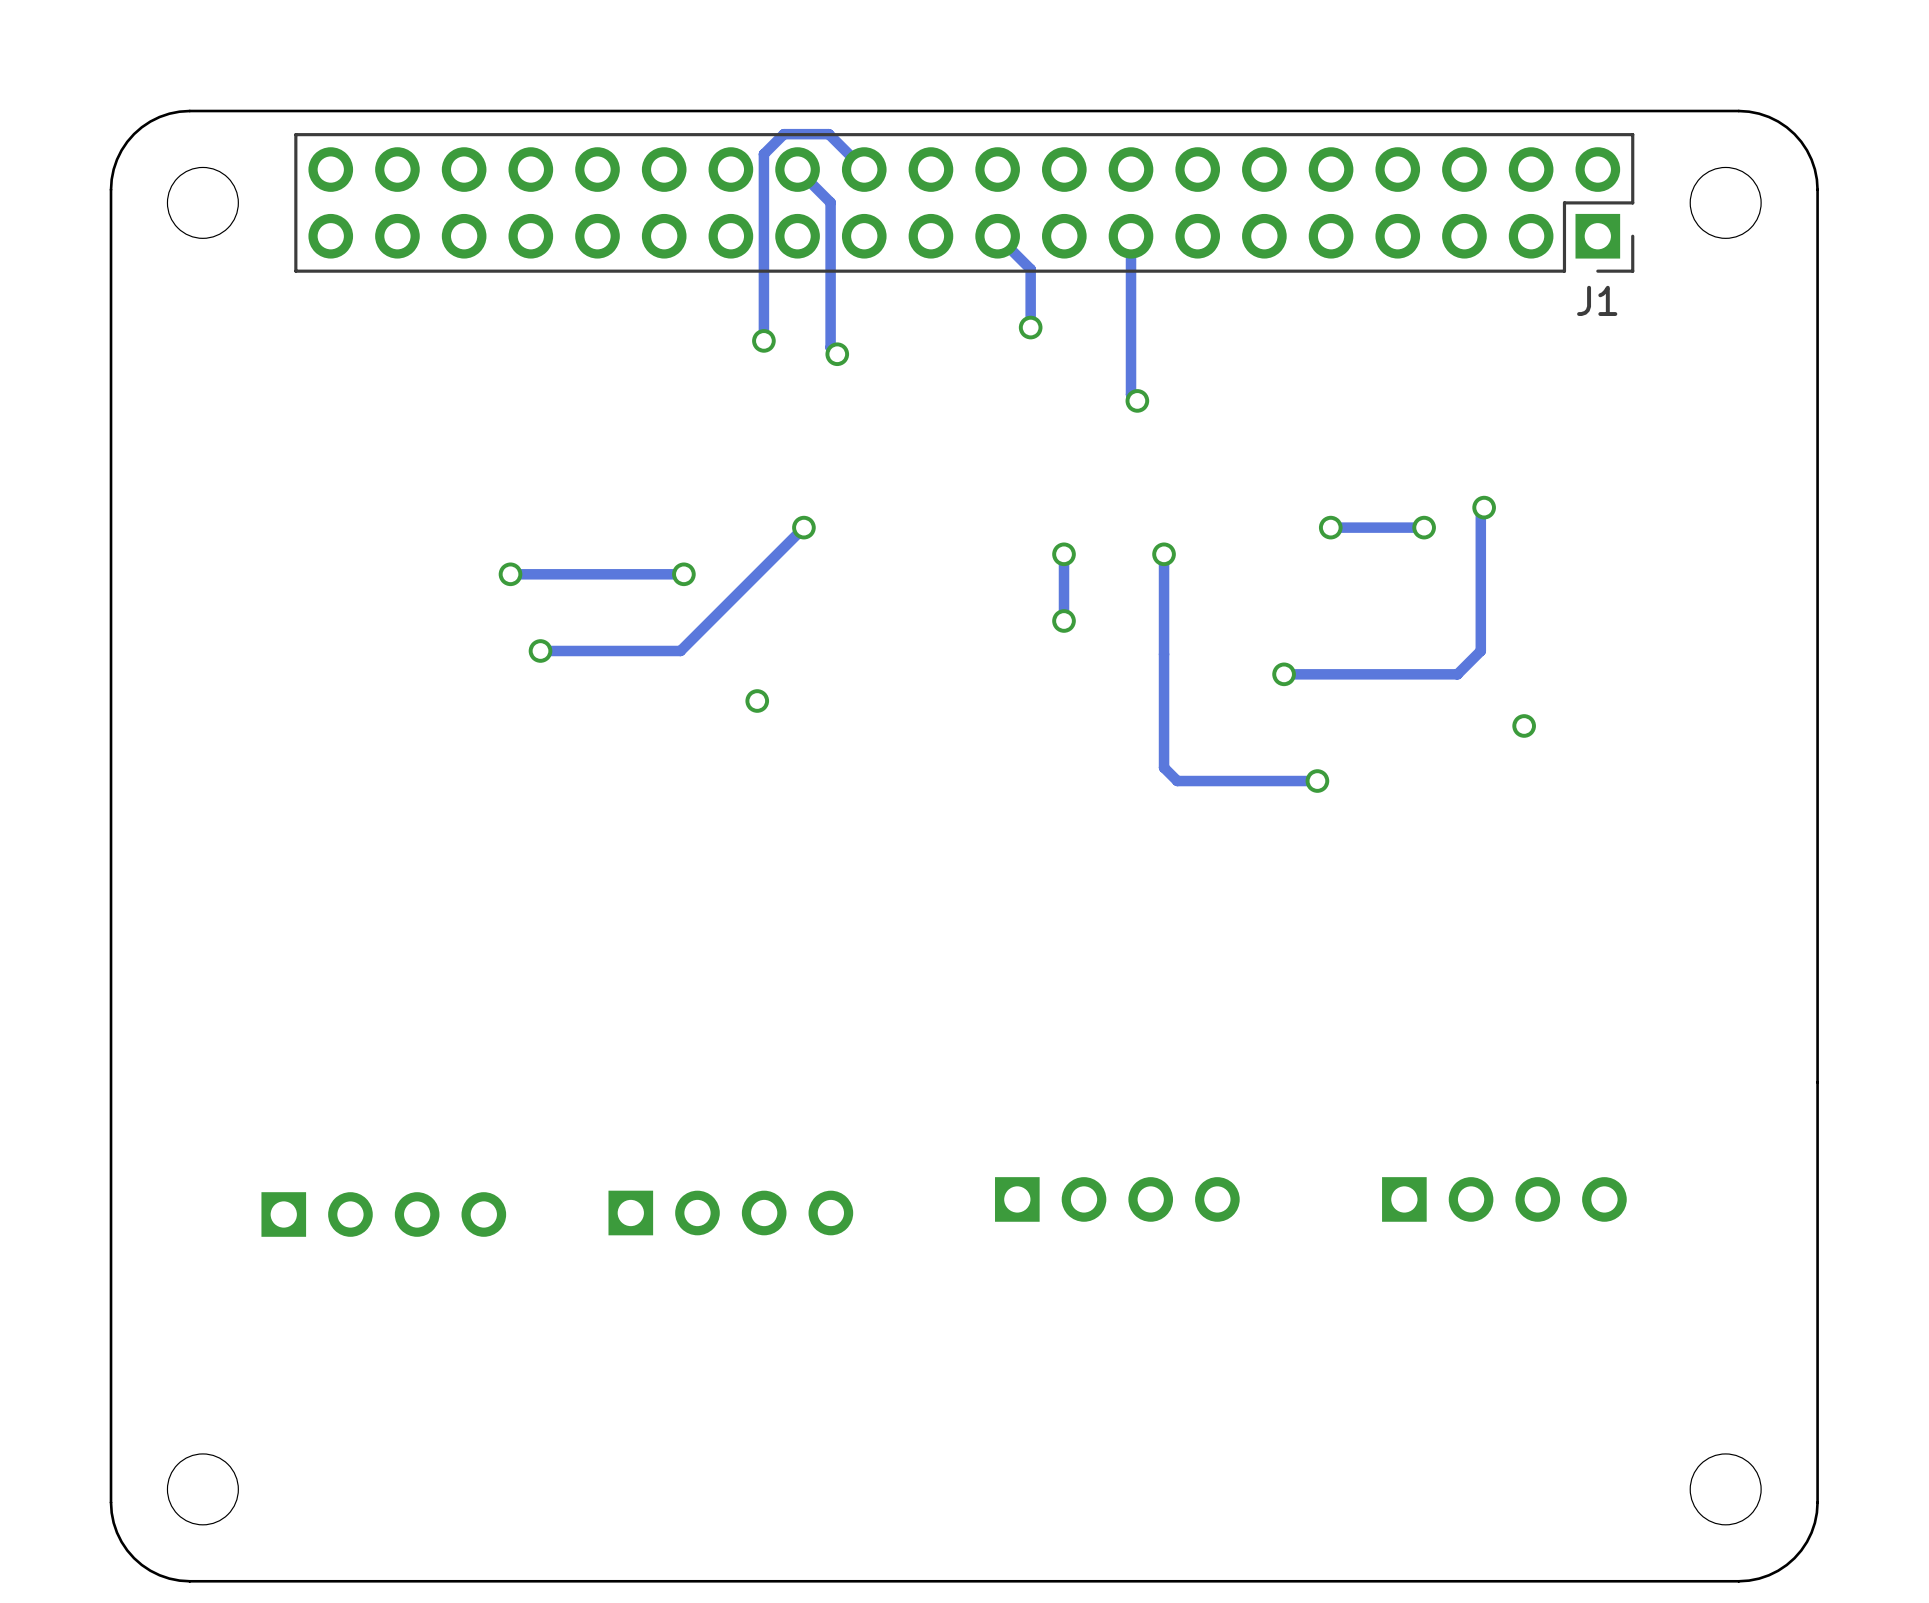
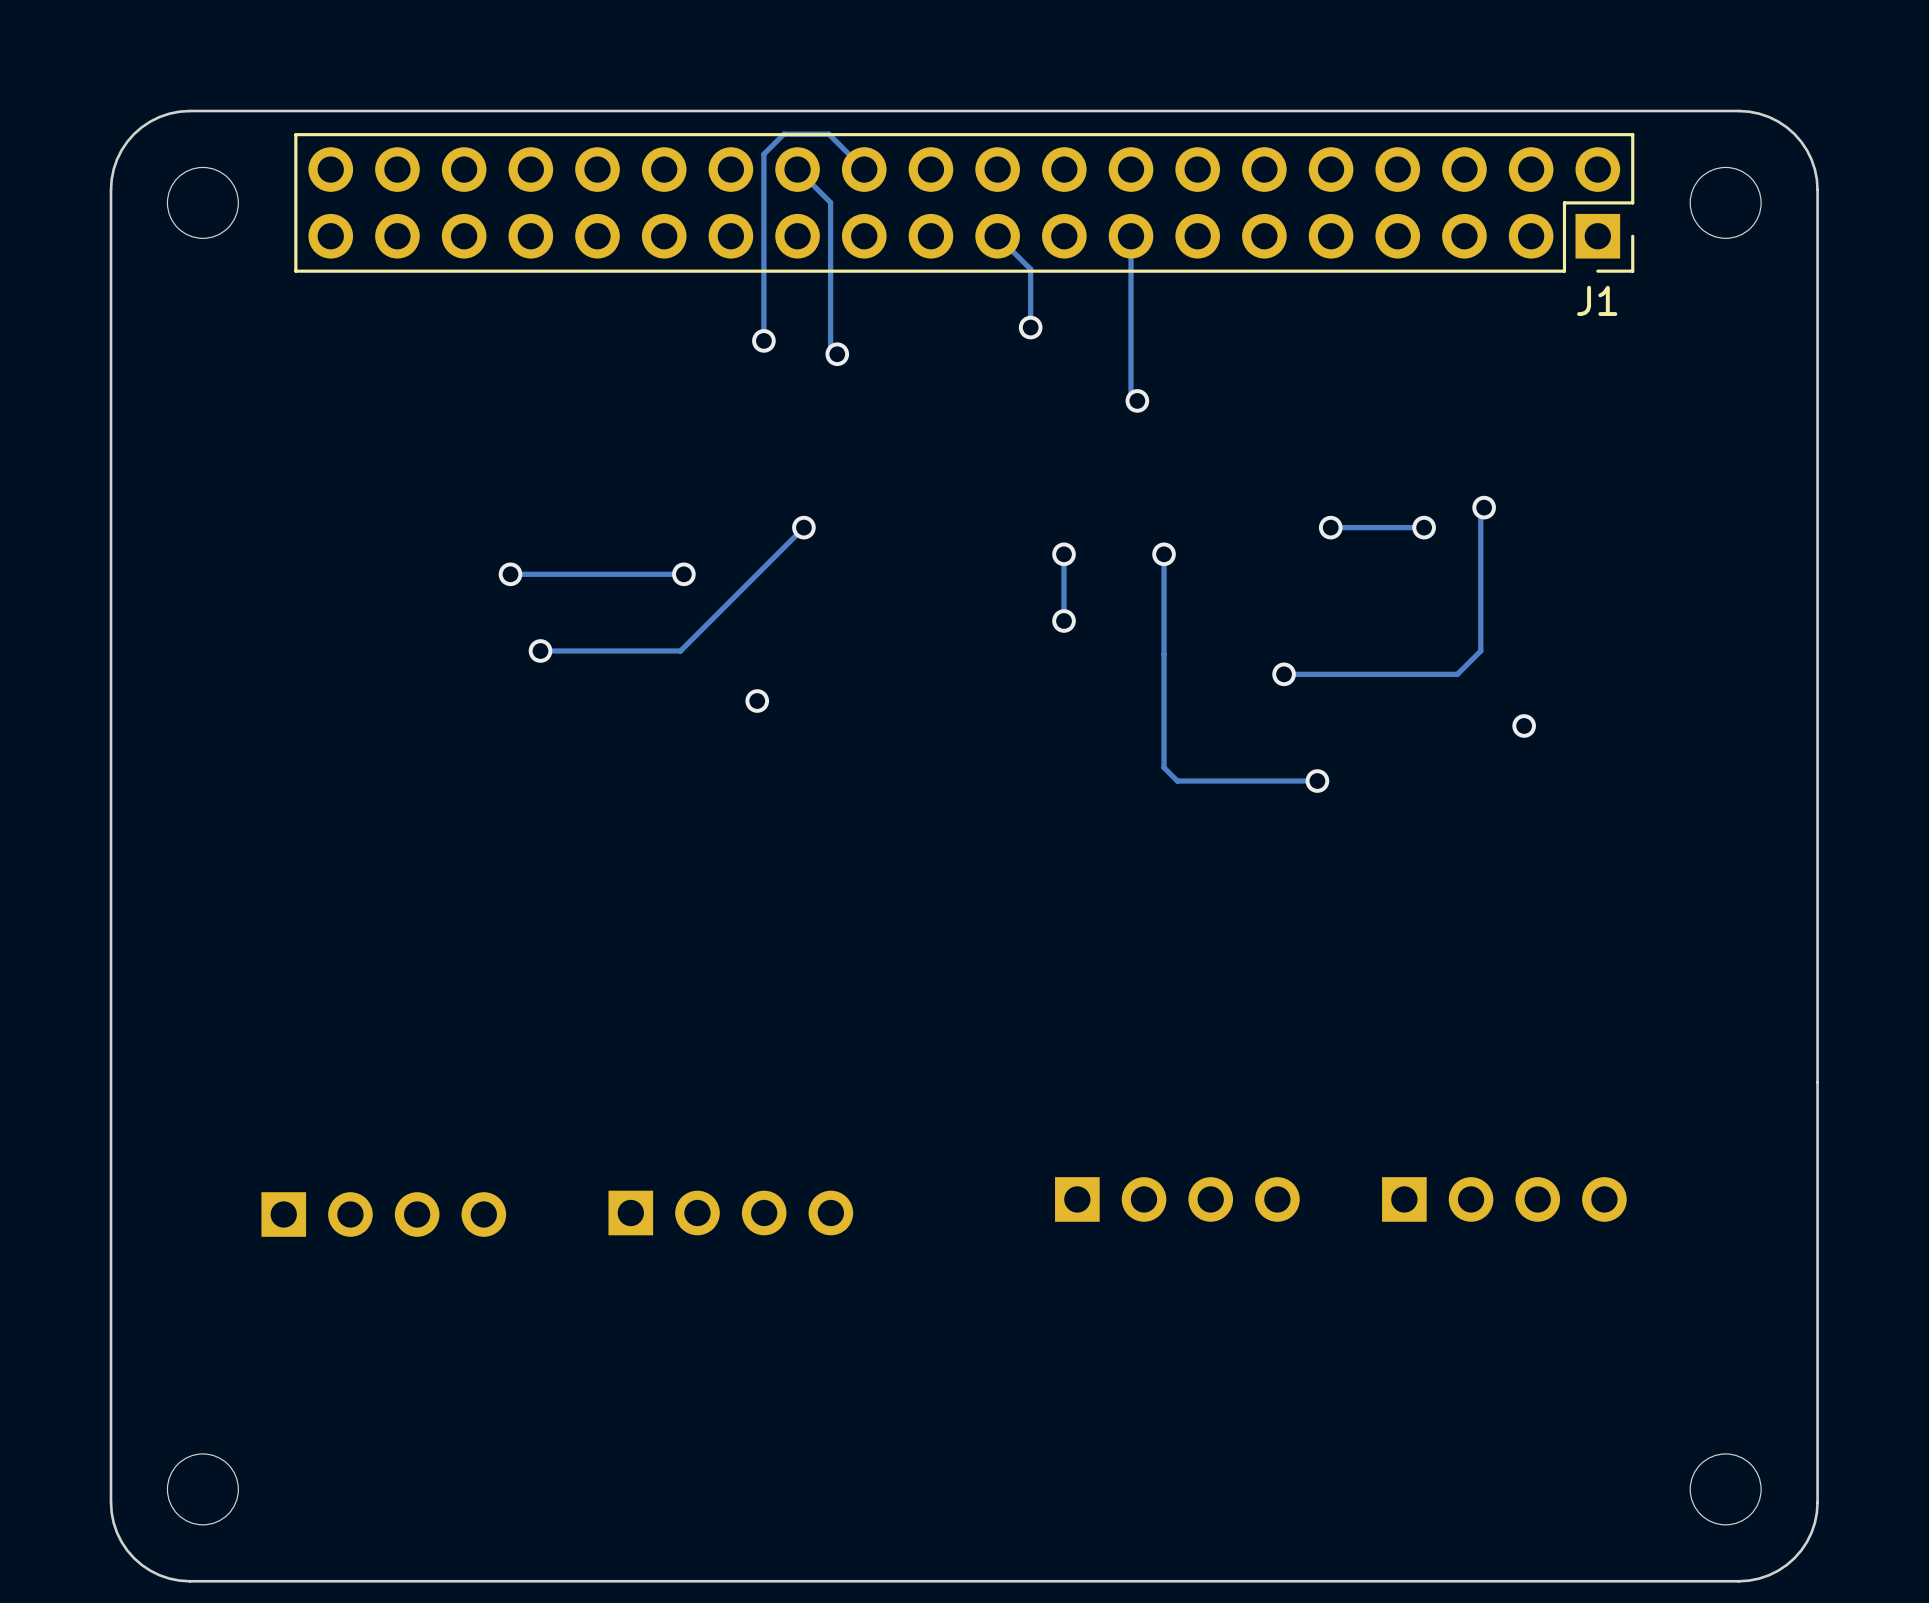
track width: thick (797, 169) (830, 202) (830, 347) (837, 354) -> thin (797, 169) (830, 202) (830, 347) (837, 354)
track width: thick (864, 169) (828, 134) (783, 134) (763, 154) (763, 340) -> thin (864, 169) (828, 134) (783, 134) (763, 154) (763, 340)
track width: thick (997, 236) (1030, 269) (1030, 327) -> thin (997, 236) (1030, 269) (1030, 327)
track width: thick (1131, 236) (1131, 394) (1137, 400) -> thin (1131, 236) (1131, 394) (1137, 400)
track width: thick (1484, 507) (1480, 510) (1480, 650) (1457, 674) (1284, 674) -> thin (1484, 507) (1480, 510) (1480, 650) (1457, 674) (1284, 674)
track width: thick (803, 527) (680, 650) (540, 650) -> thin (803, 527) (680, 650) (540, 650)
track width: thick (1424, 527) (1330, 527) -> thin (1424, 527) (1330, 527)
track width: thick (1064, 554) (1064, 620) -> thin (1064, 554) (1064, 620)
track width: thick (1164, 554) (1164, 767) (1177, 781) (1317, 781) -> thin (1164, 554) (1164, 767) (1177, 781) (1317, 781)
track width: thick (683, 574) (510, 574) -> thin (683, 574) (510, 574)
part position: (1117, 1199) -> (1177, 1199)

